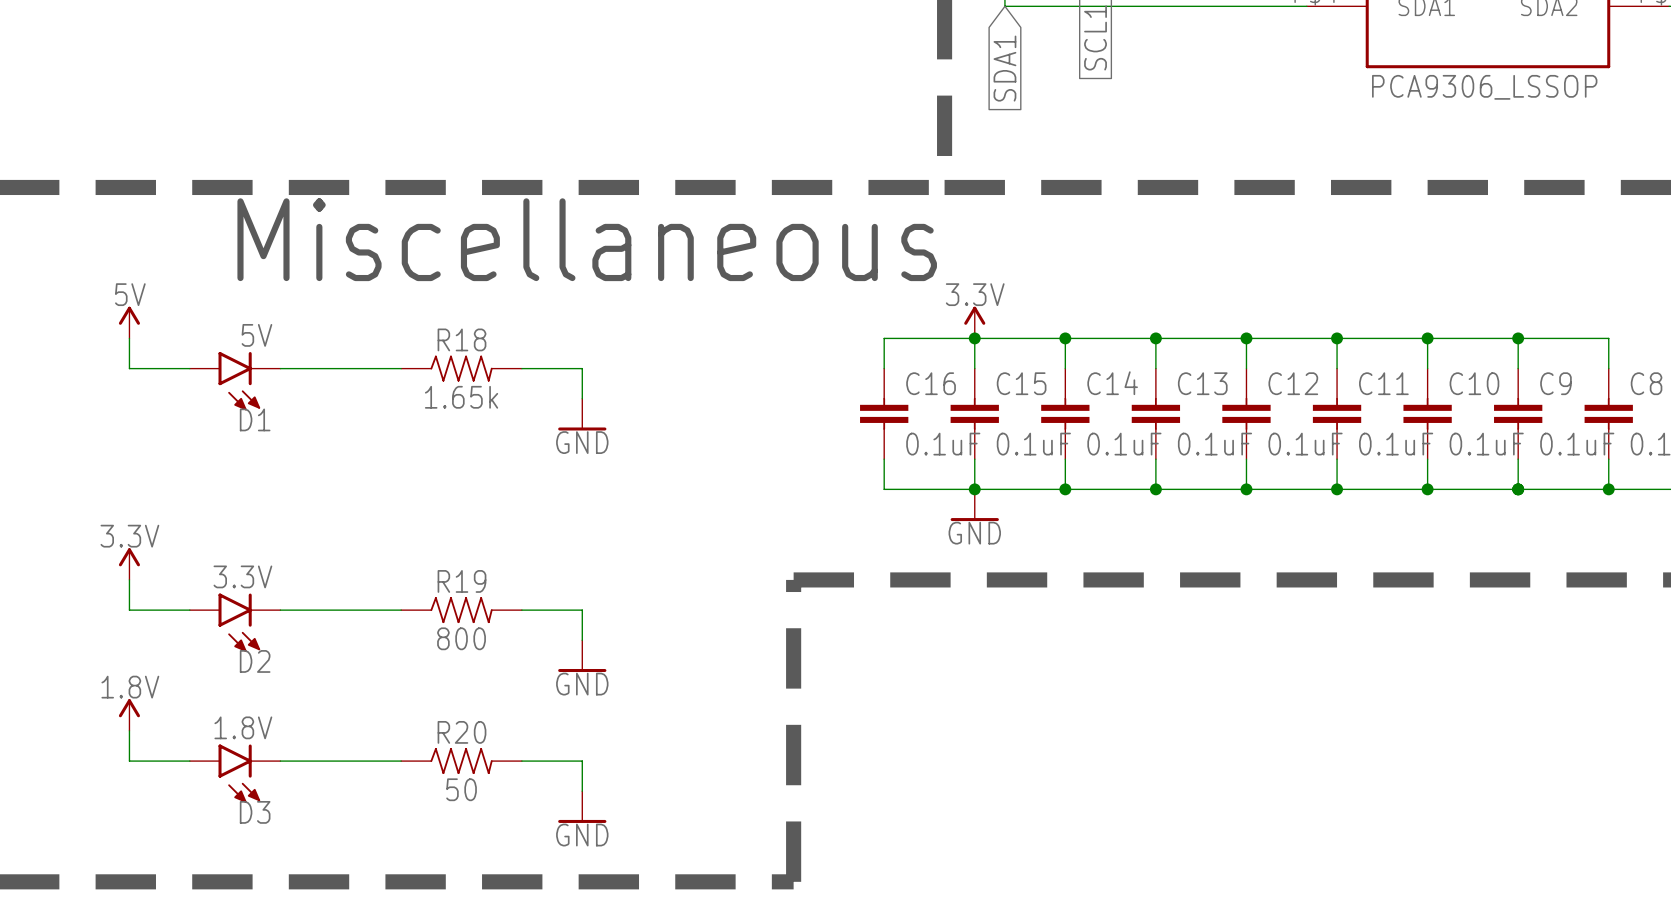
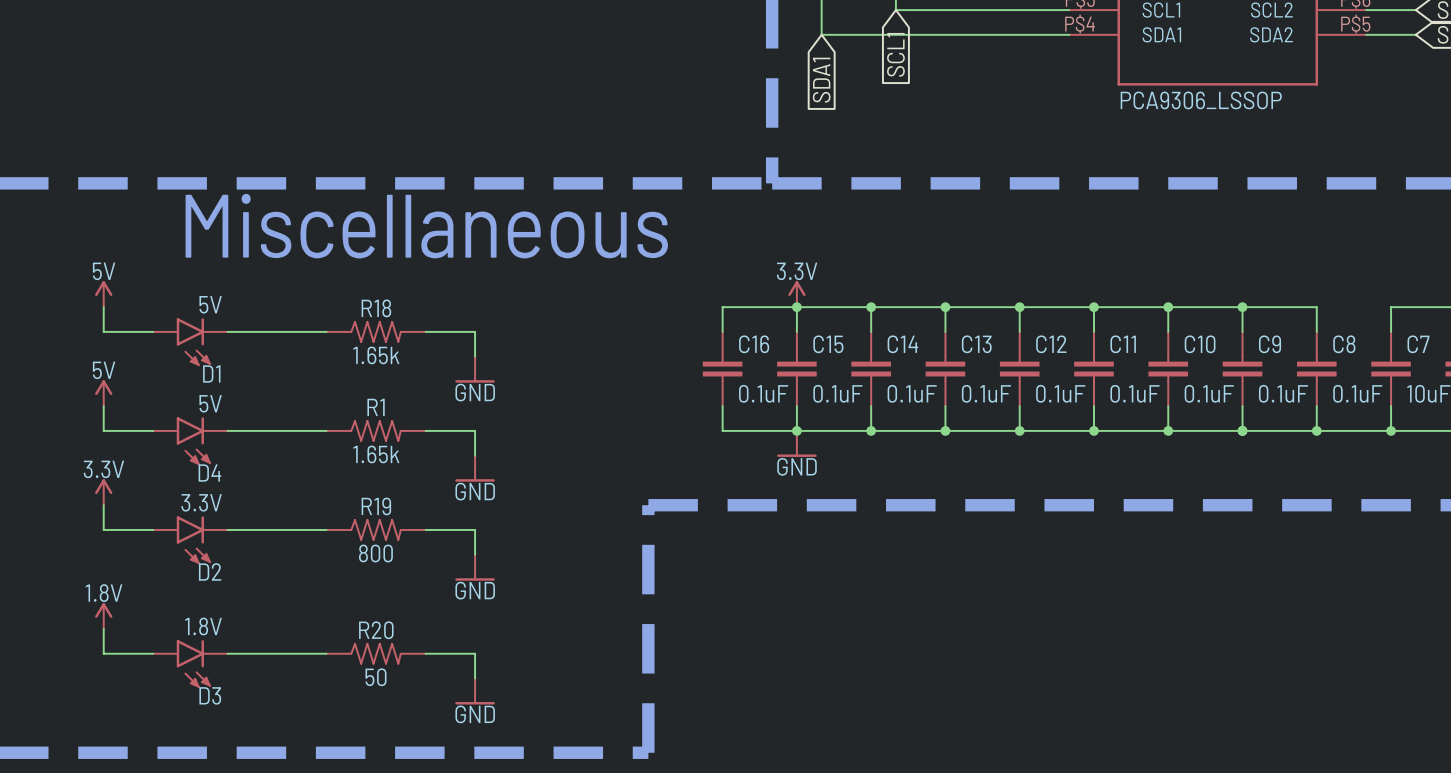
power symbol: none -> 5V (103, 393)
wire: none -> (103, 406) (103, 430) (153, 430)
wire: none -> (227, 430) (326, 430)
R1: none -> 1.65k (376, 430)
wire: none -> (425, 430) (475, 430) (475, 455)
D4: none -> 5V (190, 441)
power symbol: none -> GND (475, 468)

